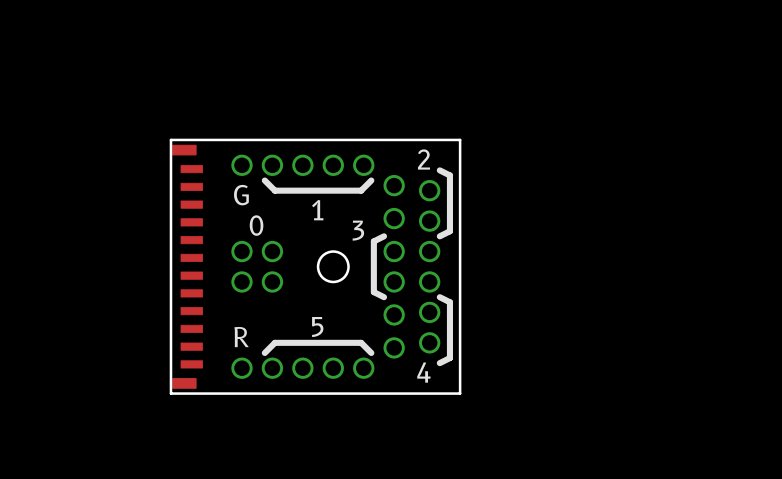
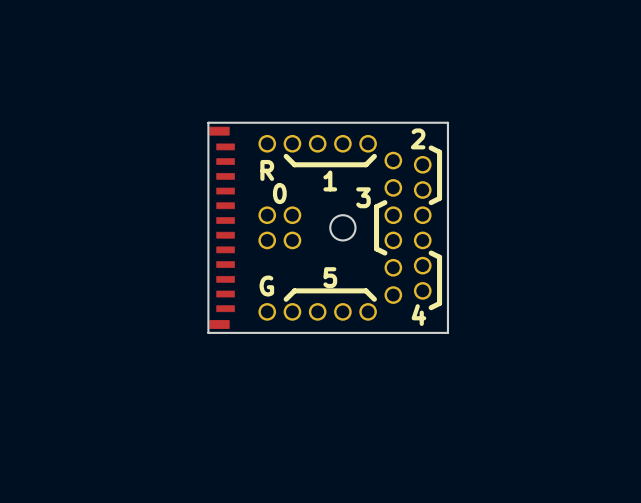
text: G (241, 195) -> R (267, 170)
text: R (241, 337) -> G (266, 286)

